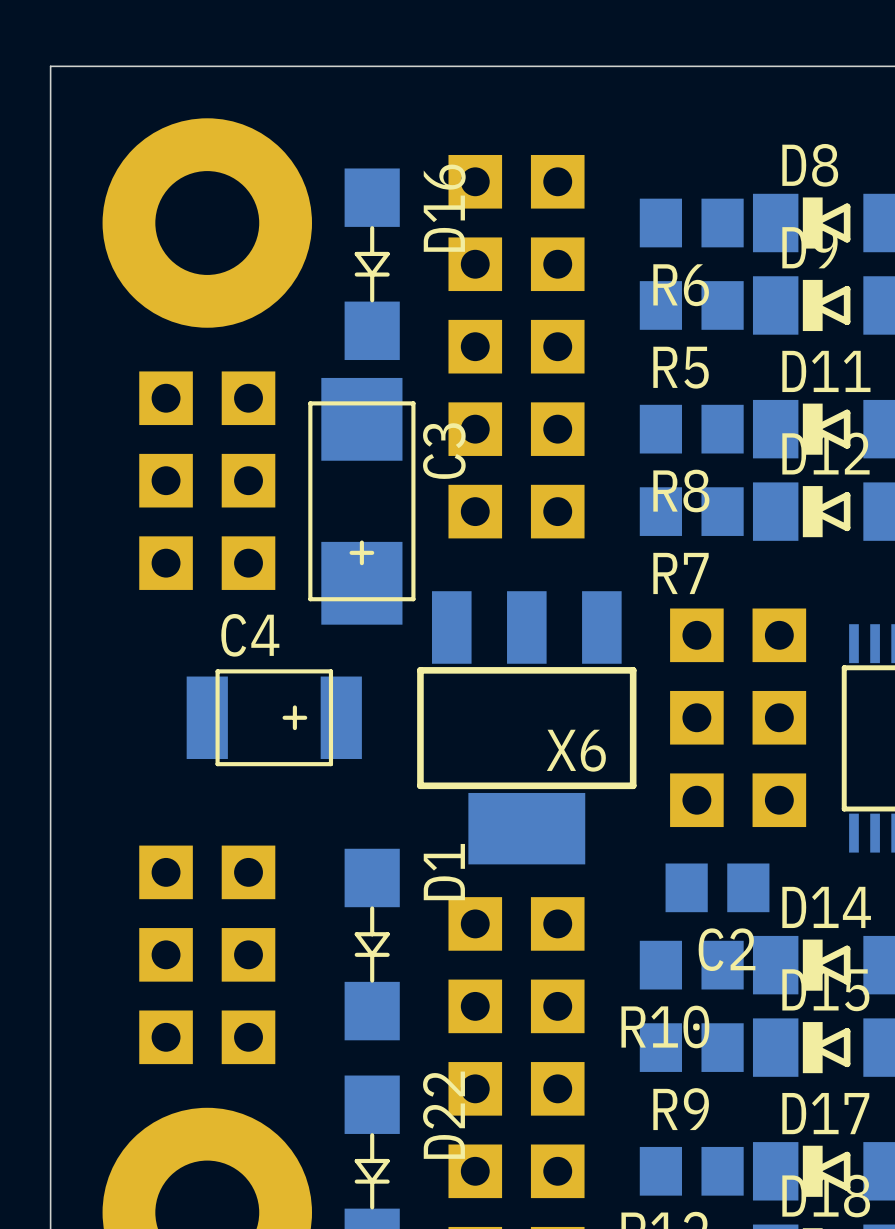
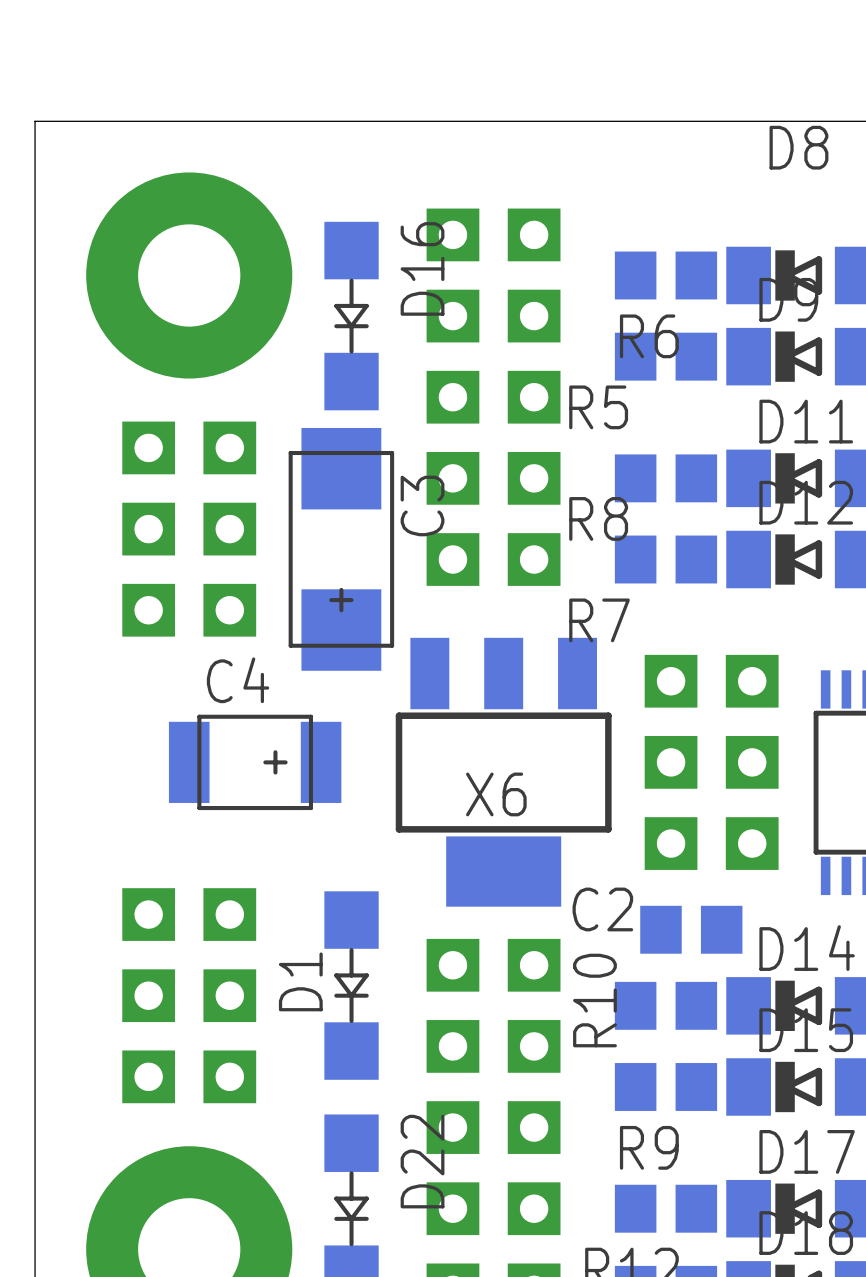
D8 name position: D8 (810, 165) -> D8 (798, 147)
R5 name position: R5 (681, 367) -> R5 (598, 407)
R8 name position: R8 (681, 491) -> R8 (598, 518)
R7 name position: R7 (681, 573) -> R7 (599, 620)
X6 name position: X6 (576, 750) -> X6 (496, 794)
D1 name position: D1 (444, 872) -> D1 (300, 981)
C2 name position: C2 (727, 949) -> C2 (602, 909)
R10 name rotation: 0° (665, 1026) -> 90° counterclockwise (594, 1000)

